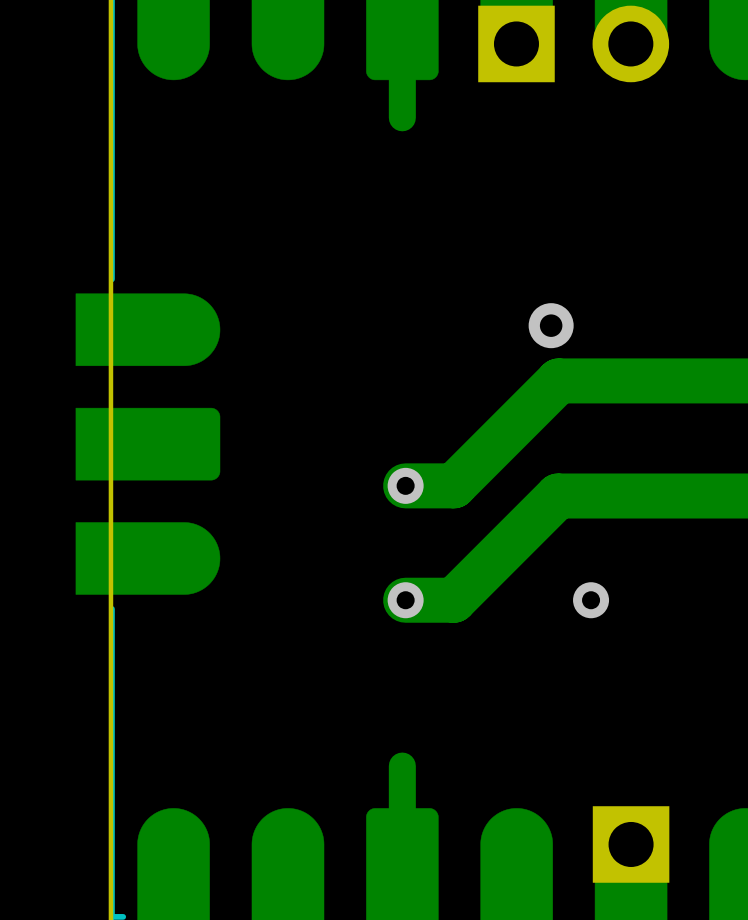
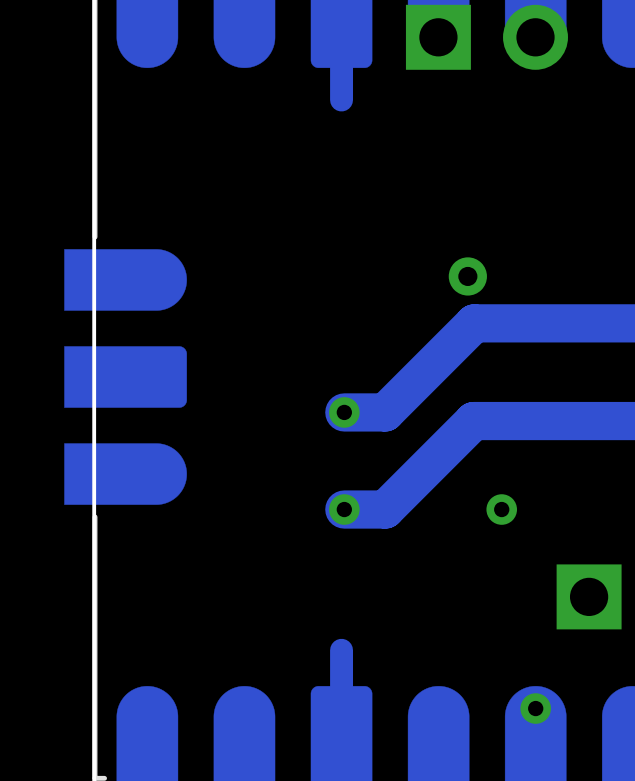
via: none -> (535, 708)
part position: (631, 844) -> (589, 596)

